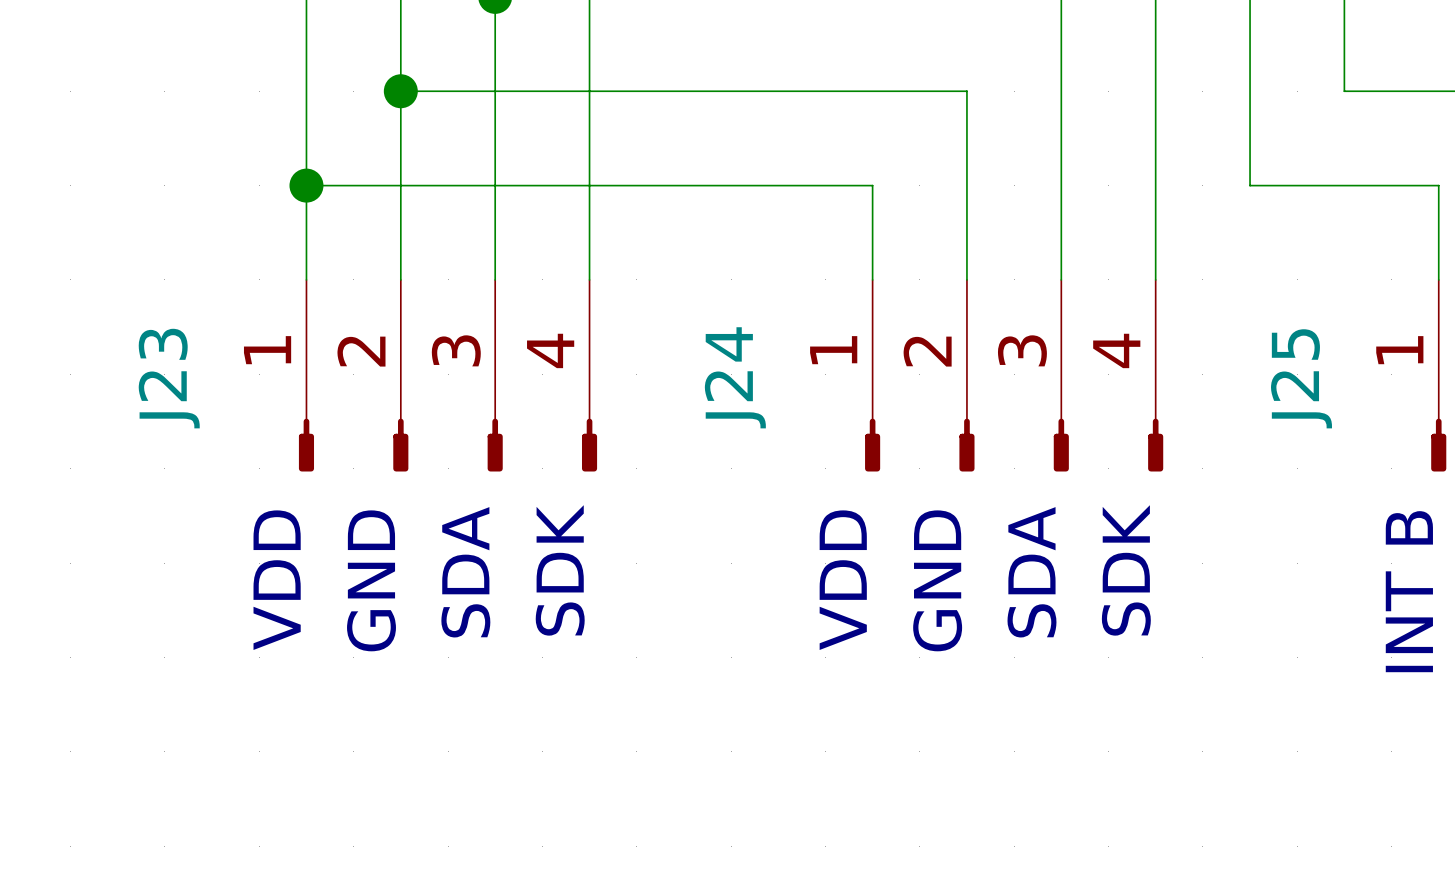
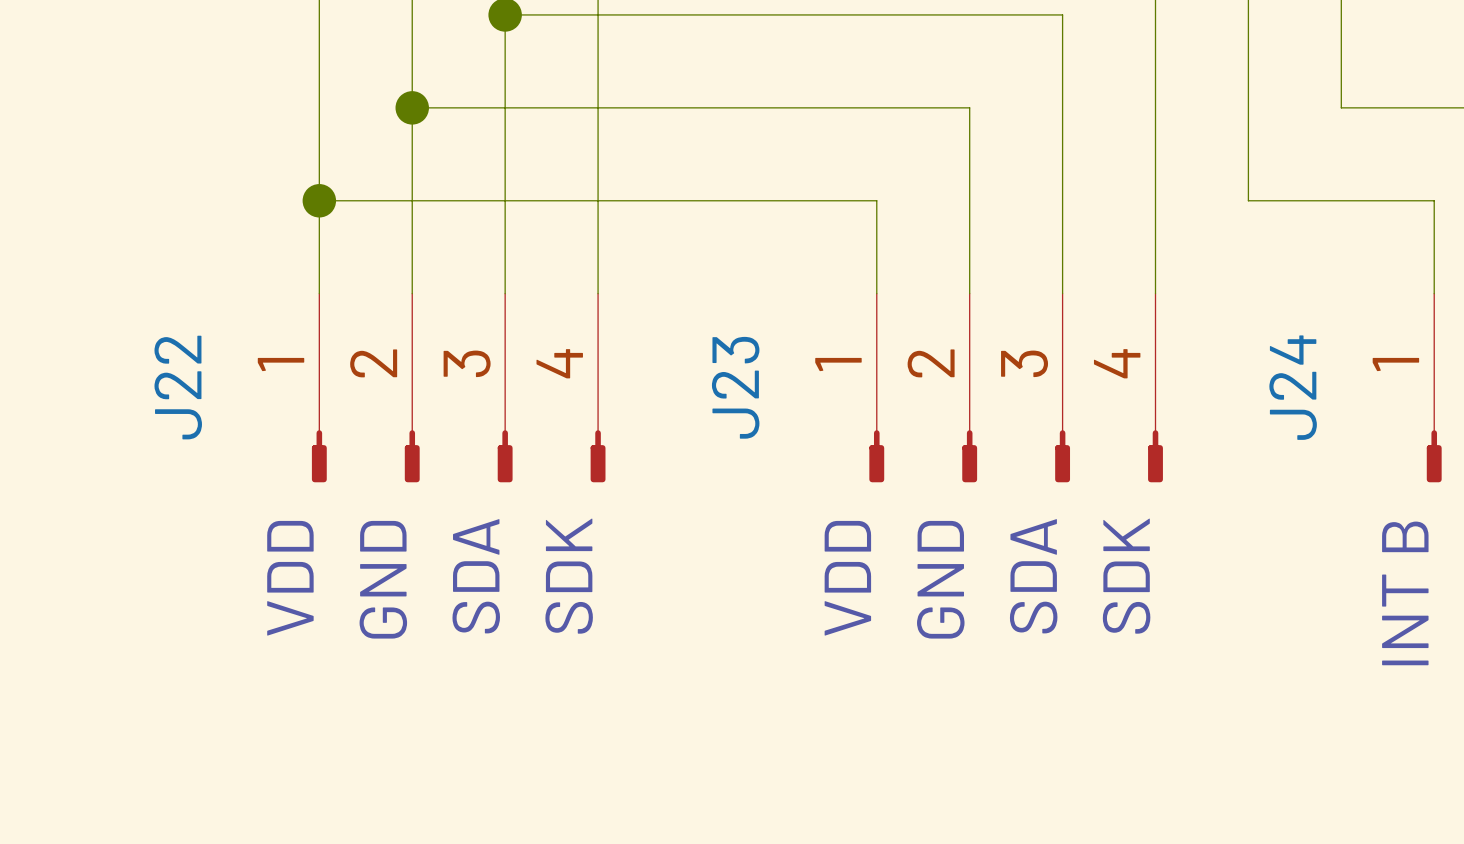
J24 name: J24 (735, 377) -> J23 (735, 387)
J23 name: J23 (169, 378) -> J22 (178, 387)
J25 name: J25 (1301, 378) -> J24 (1293, 387)

